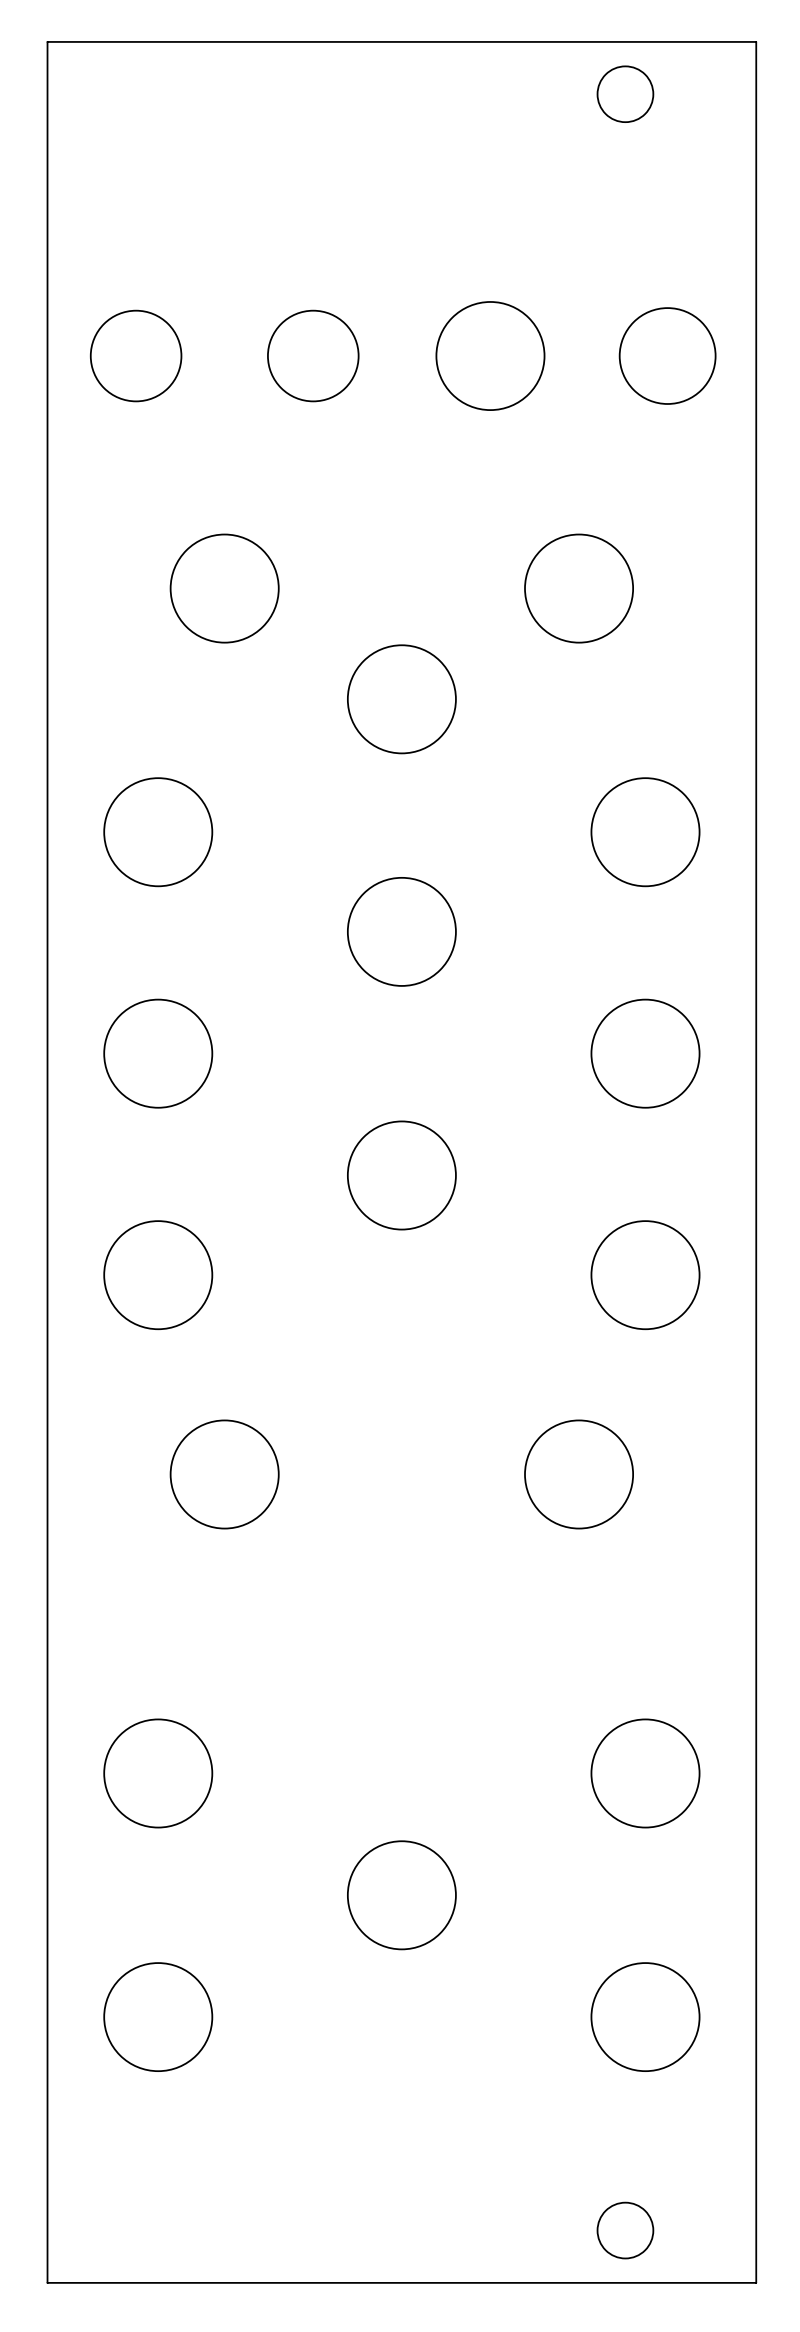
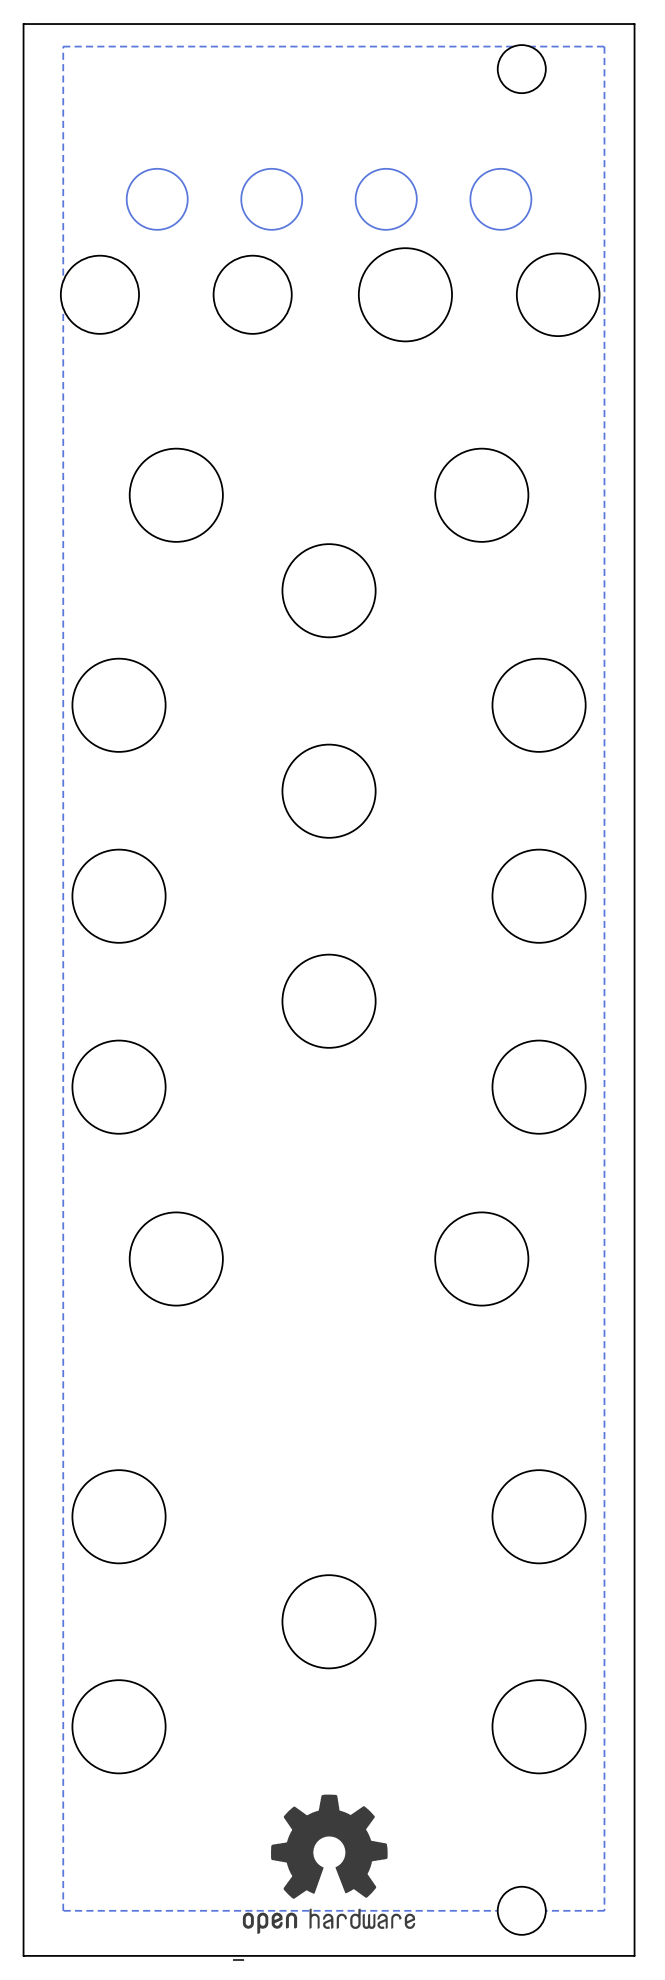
zone outline: none -> (604, 46) (604, 1910) (63, 1910) (63, 46) (604, 46)
zone outline: none -> (157, 168) (168, 171) (178, 177) (185, 187) (187, 199) (185, 211) (178, 220) (168, 227) (157, 229) (145, 227) (135, 220) (128, 211) (126, 199) (128, 187) (135, 177) (145, 171) (157, 168)
zone outline: none -> (271, 168) (283, 171) (293, 177) (299, 187) (302, 199) (299, 211) (293, 220) (283, 227) (271, 229) (260, 227) (250, 220) (243, 211) (241, 199) (243, 187) (250, 177) (260, 171) (271, 168)
zone outline: none -> (386, 168) (398, 171) (407, 177) (414, 187) (416, 199) (414, 210) (407, 220) (397, 227) (386, 229) (375, 228) (365, 222) (359, 213) (355, 199) (357, 188) (365, 176) (375, 170) (386, 168)
zone outline: none -> (500, 168) (512, 171) (522, 177) (529, 187) (531, 199) (529, 211) (522, 220) (512, 227) (500, 229) (489, 227) (479, 220) (472, 211) (470, 199) (472, 187) (479, 177) (489, 171) (500, 168)
drawing: none -> [242, 1794, 416, 1934]

